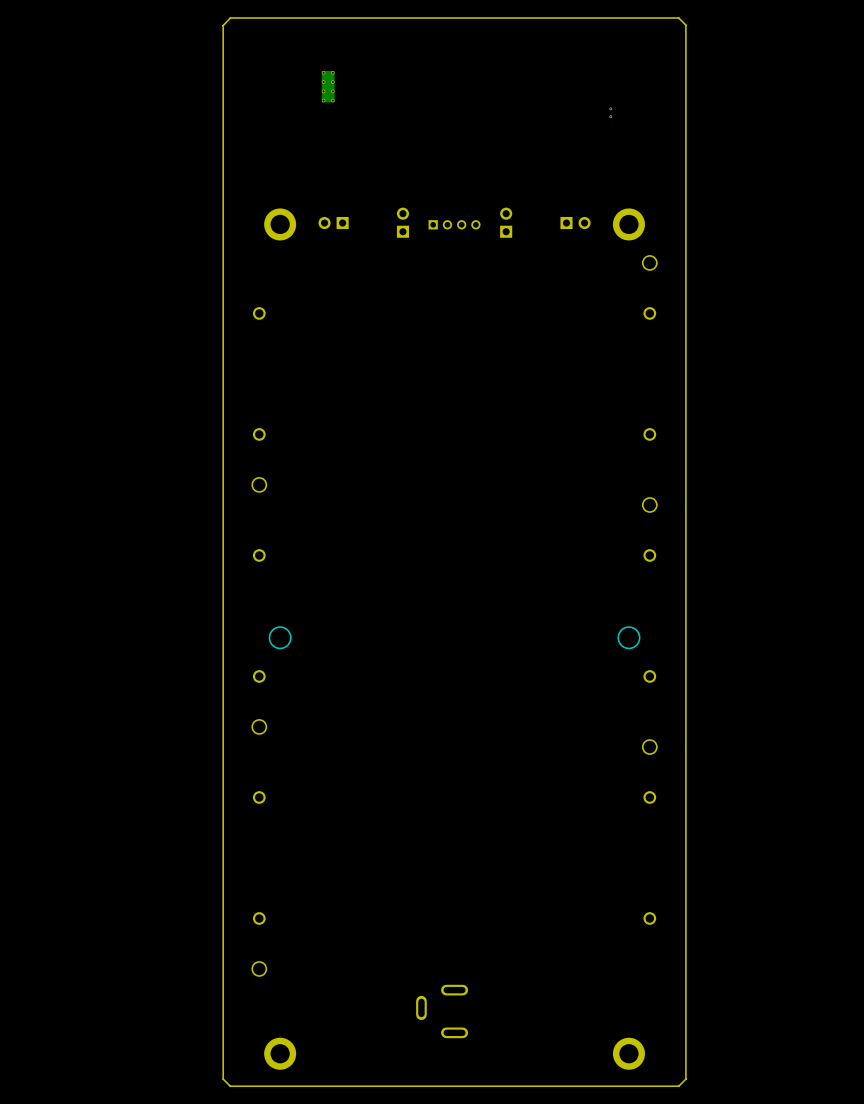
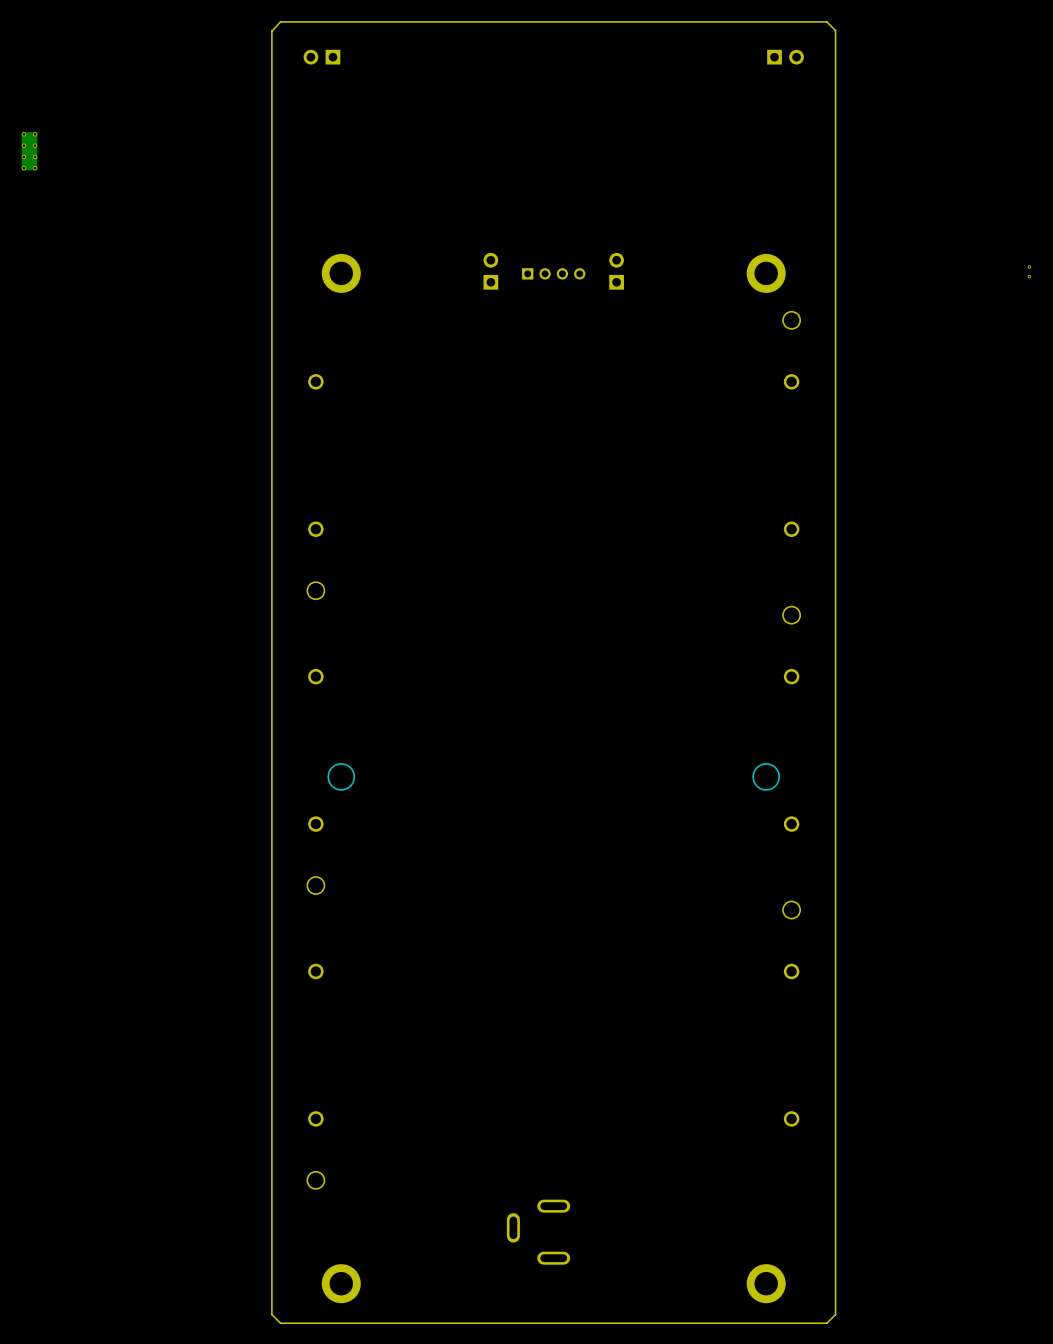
part: none -> (321, 57)
part: none -> (785, 57)
part: (328, 86) -> none
part: (610, 112) -> none
part: none -> (29, 151)
part: (333, 223) -> none
part: (575, 223) -> none
part: none -> (1029, 271)

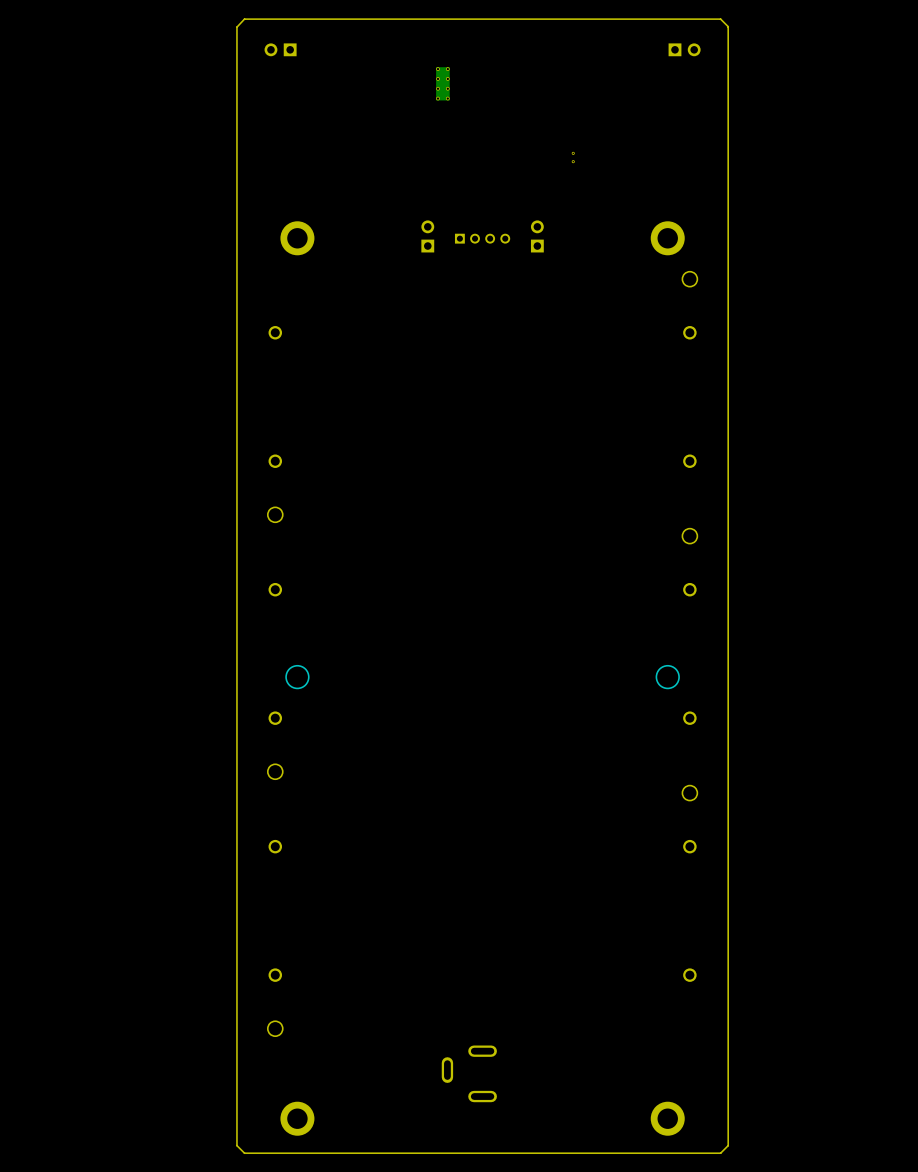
part: none -> (442, 83)
part: (29, 151) -> none
part: none -> (573, 157)
part: (1029, 271) -> none

